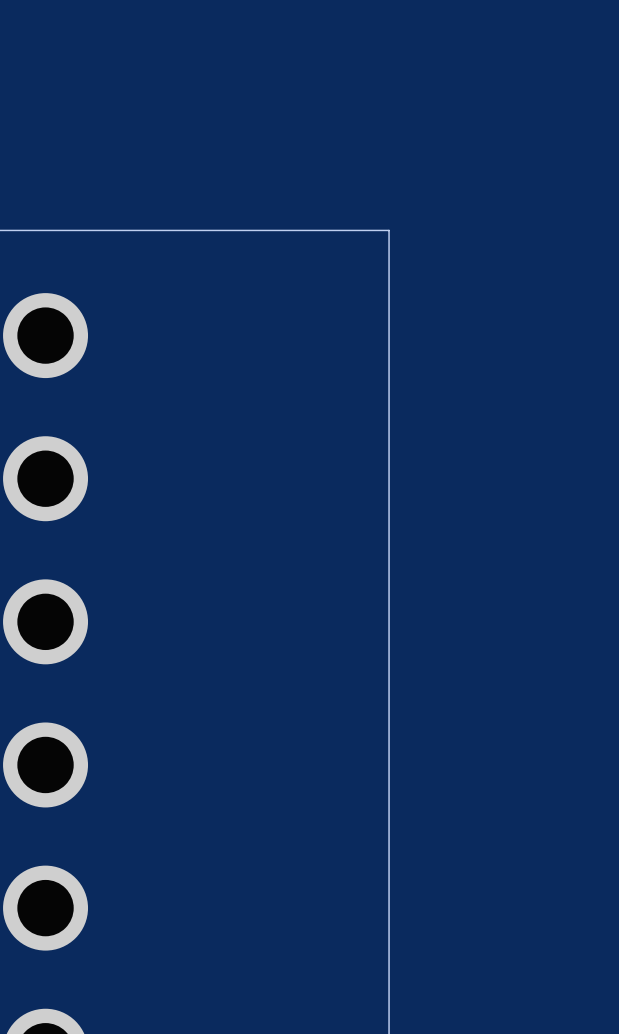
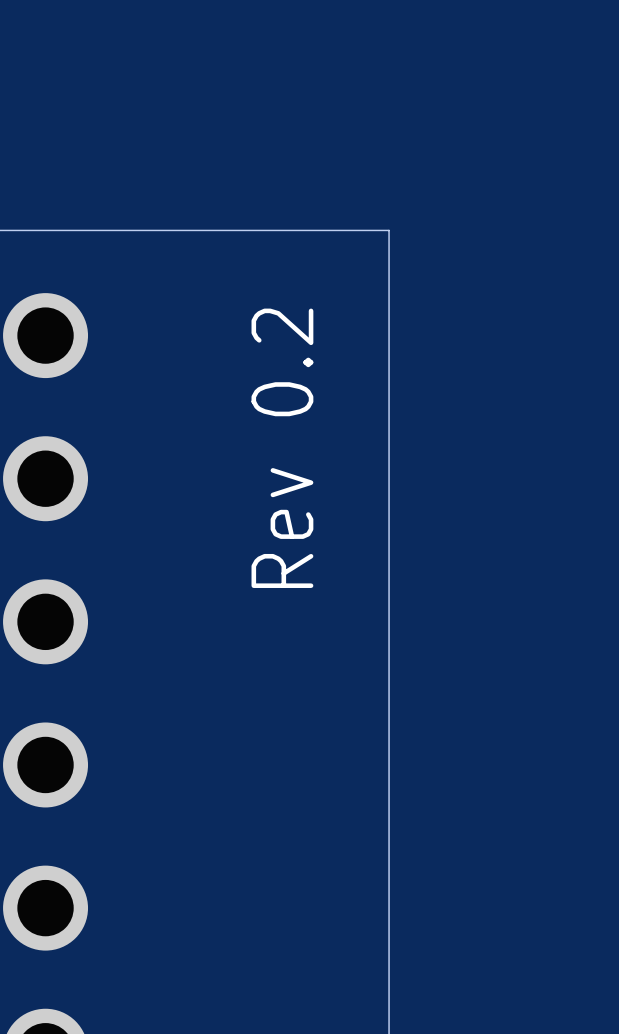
text: none -> Rev 0.2 (282, 448)

